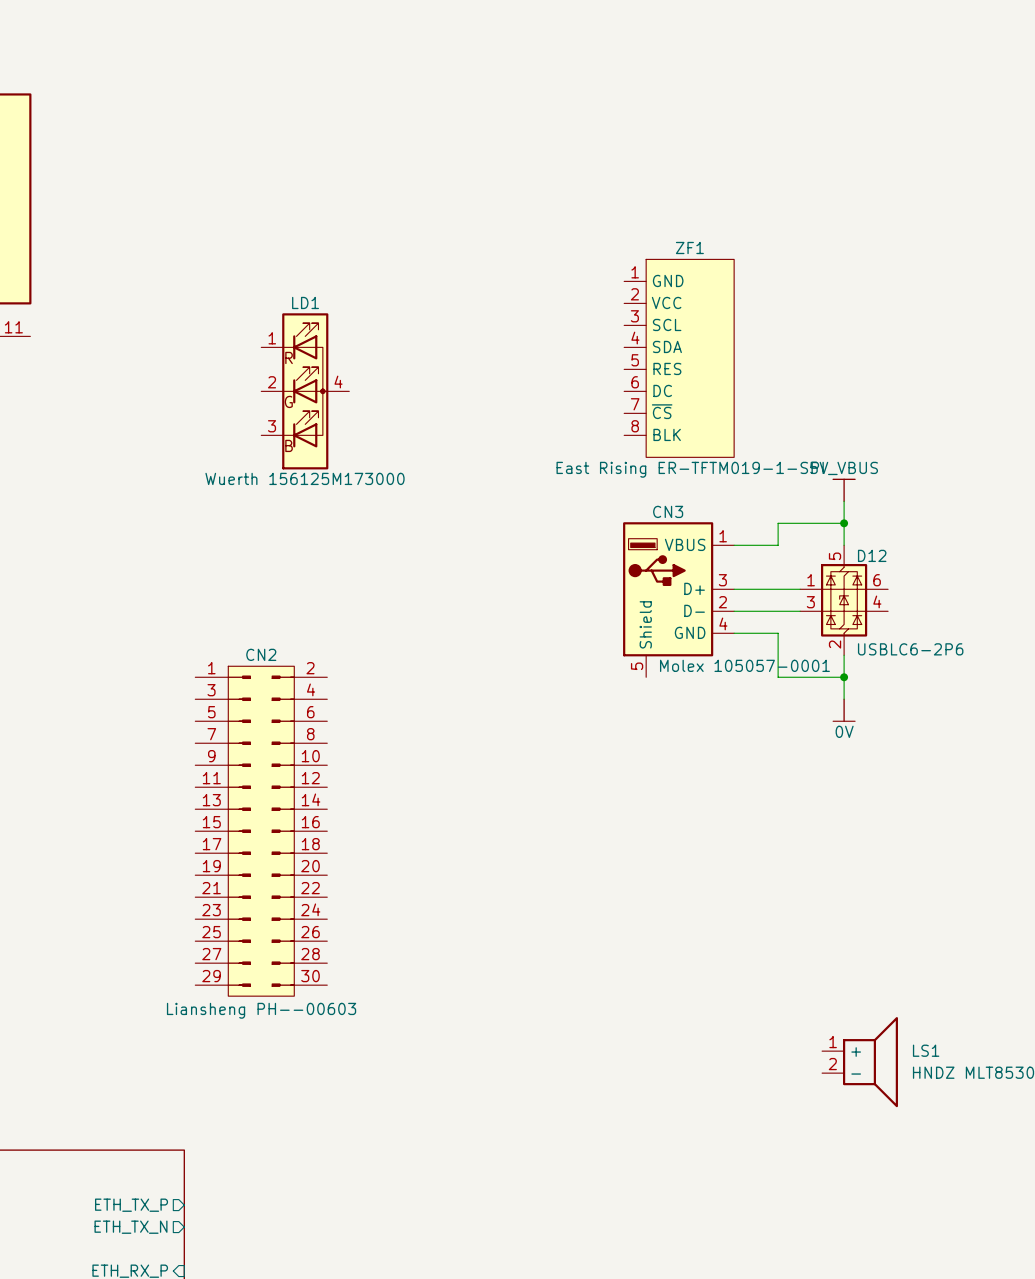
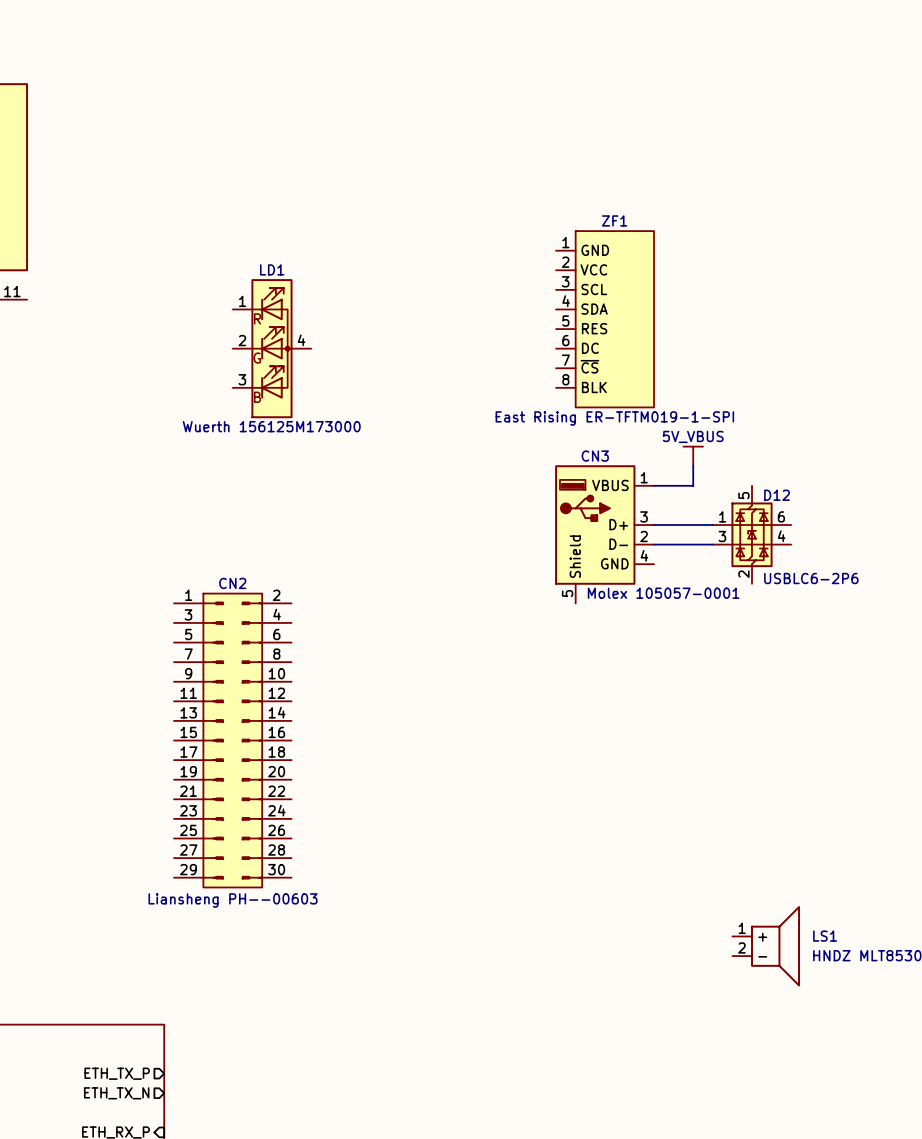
power symbol position: 5V_VBUS (844, 490) -> 5V_VBUS (693, 456)
wire: (844, 501) (844, 545) -> none
wire: (778, 523) (844, 523) -> none
junction: (844, 523) -> none
wire: (734, 633) (778, 633) (778, 677) (844, 677) -> none
wire: (844, 655) (844, 699) -> none
junction: (844, 677) -> none
power symbol: 0V (844, 710) -> none

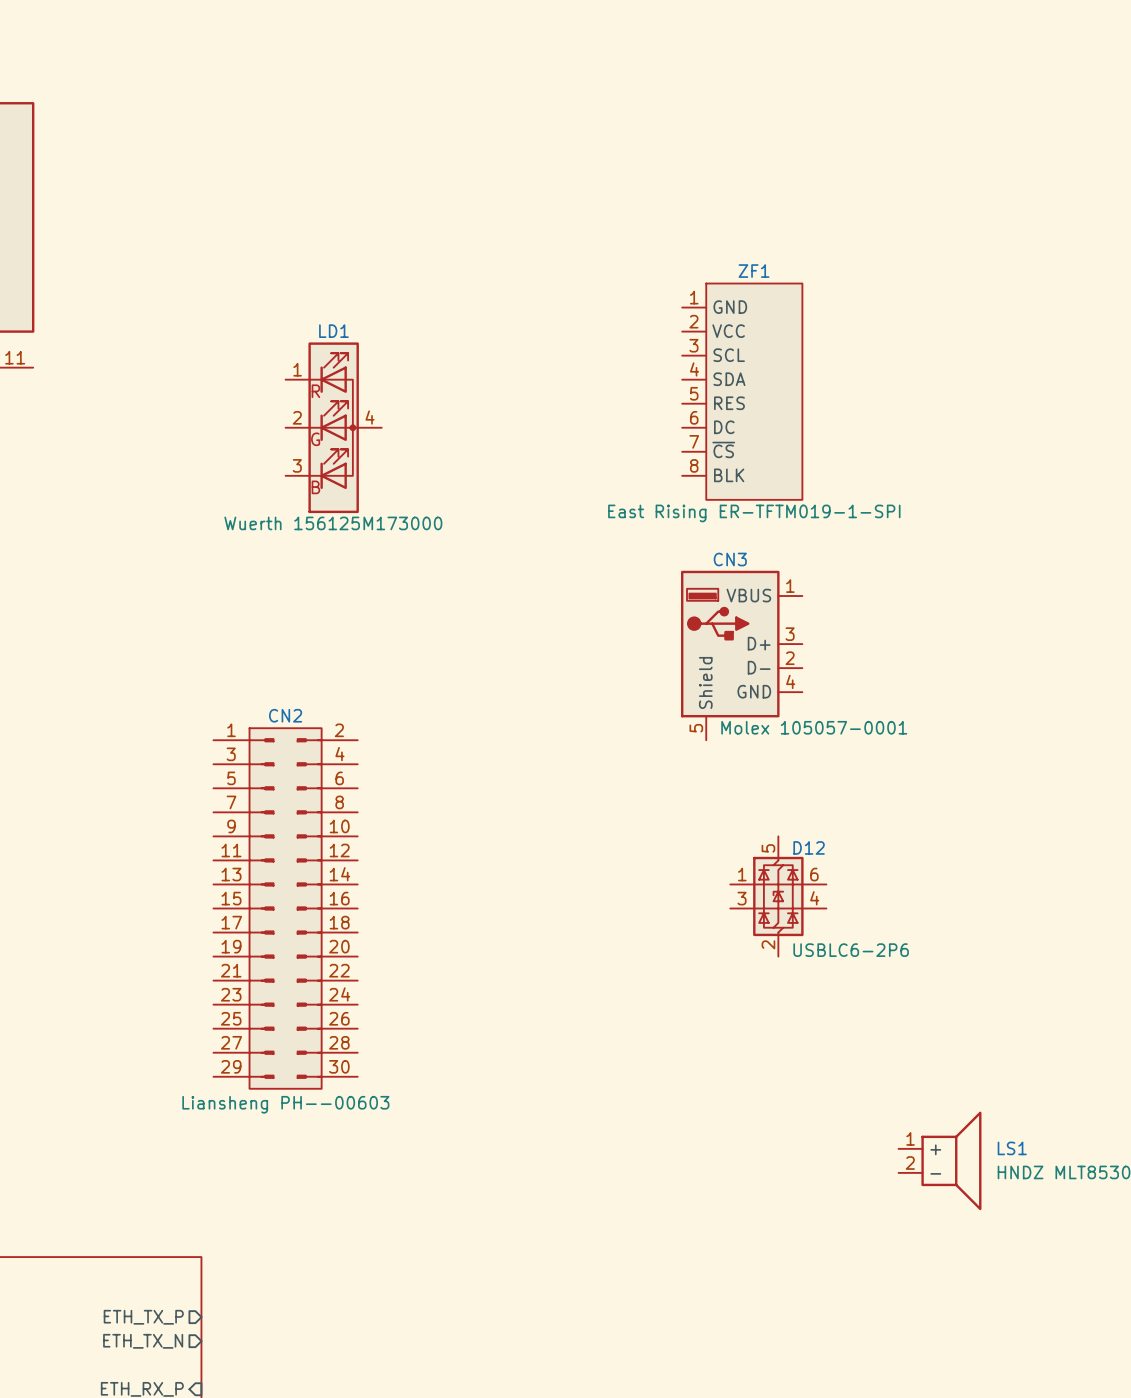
power symbol: 5V_VBUS (693, 456) -> none
wire: (693, 466) (693, 485) (654, 485) -> none
wire: (654, 525) (712, 525) -> none
D12 position: (752, 534) -> (778, 896)
wire: (654, 544) (712, 544) -> none

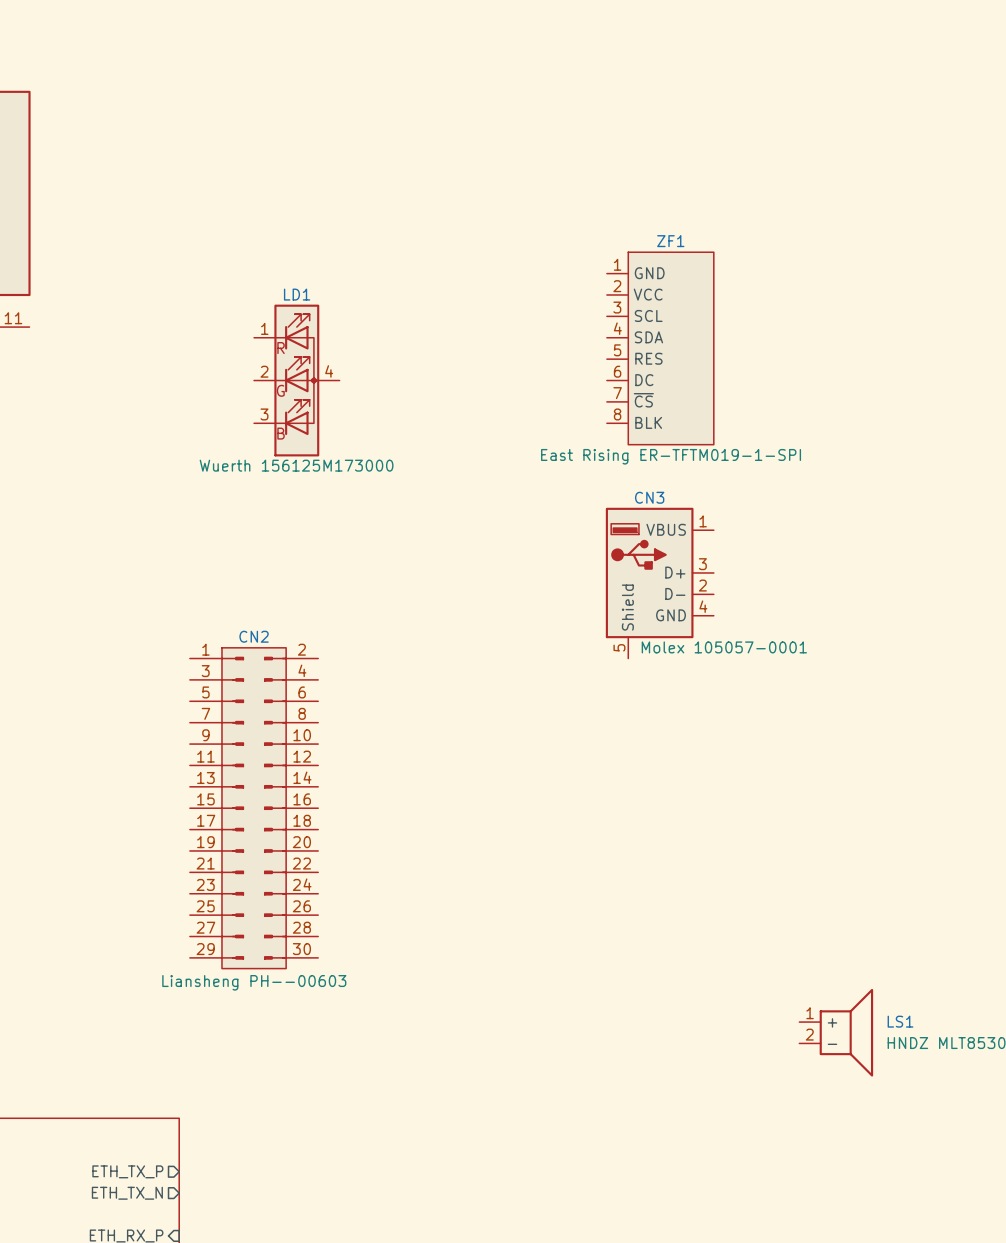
D12: USBLC6-2P6 (778, 896) -> none

